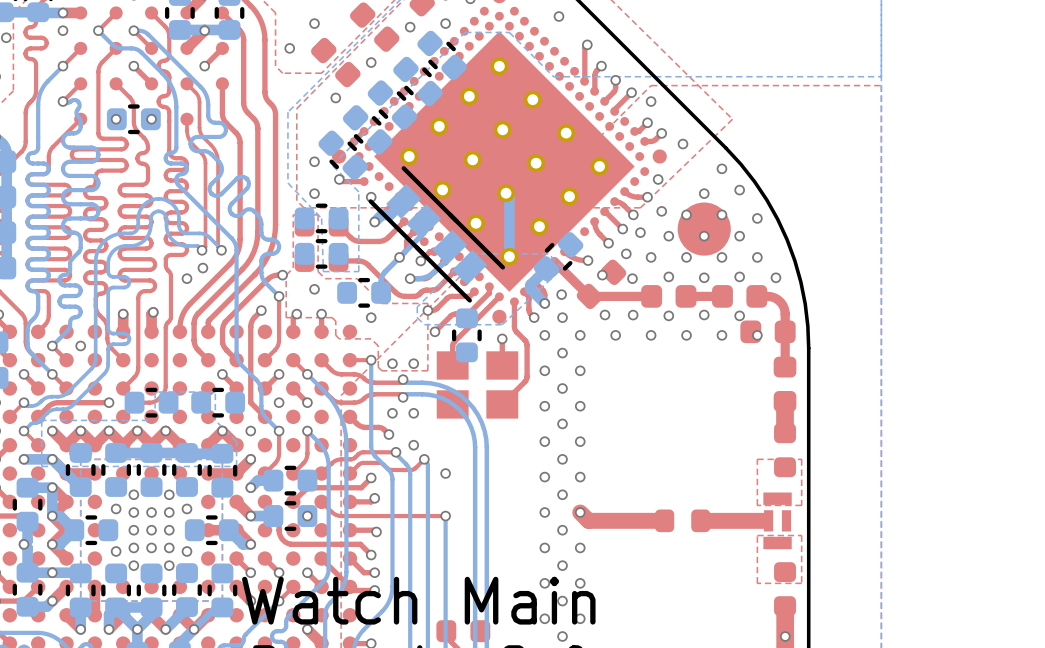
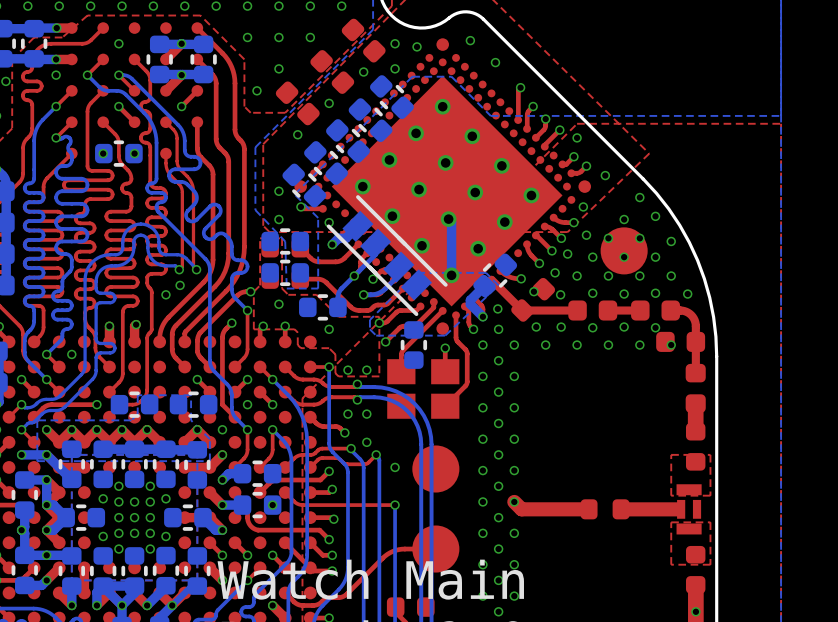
part: none -> (435, 469)
top track: none -> (435, 549) (401, 549) (392, 551) (382, 558) (345, 595) (327, 598) (316, 604) (298, 604) (285, 592)
part: none -> (435, 549)

